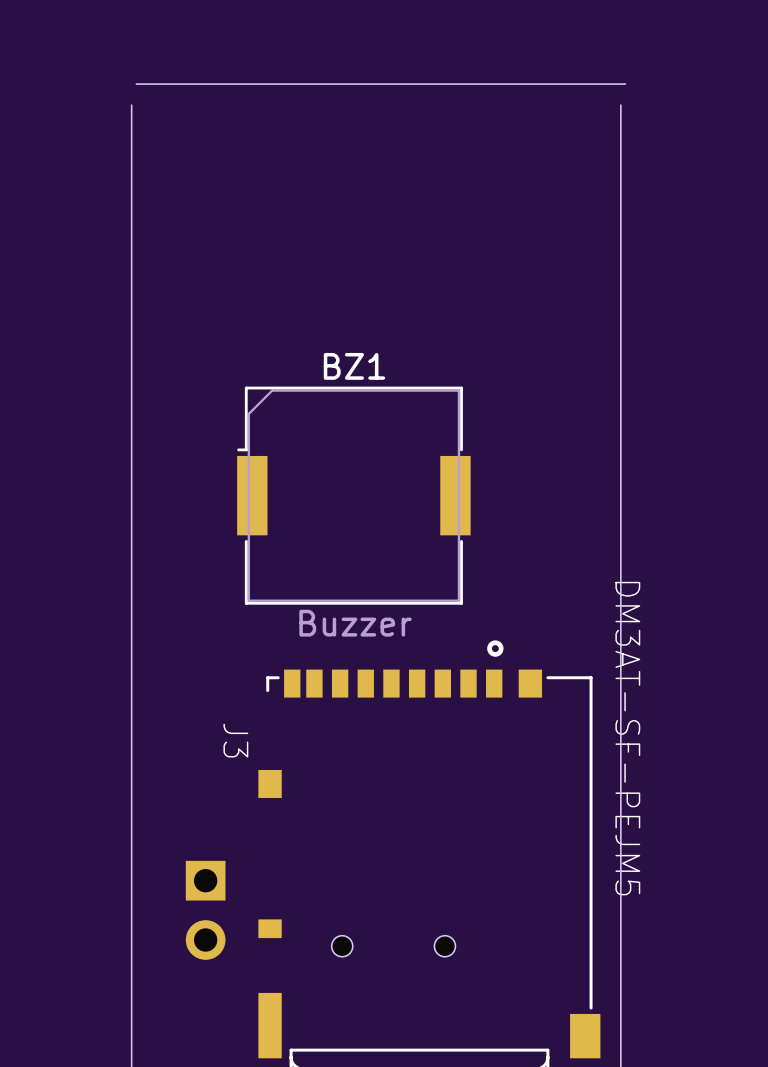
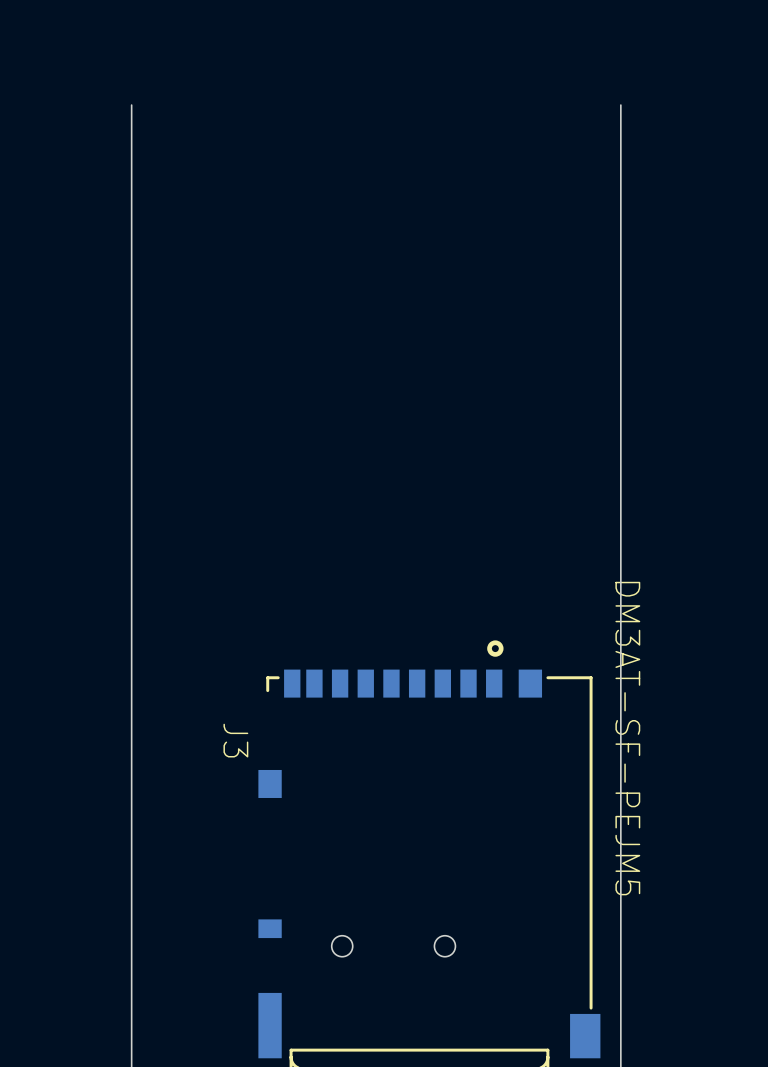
board edge: (625, 84) (136, 84) -> none
BZ1: Buzzer (353, 495) -> none
part: (205, 910) -> none

